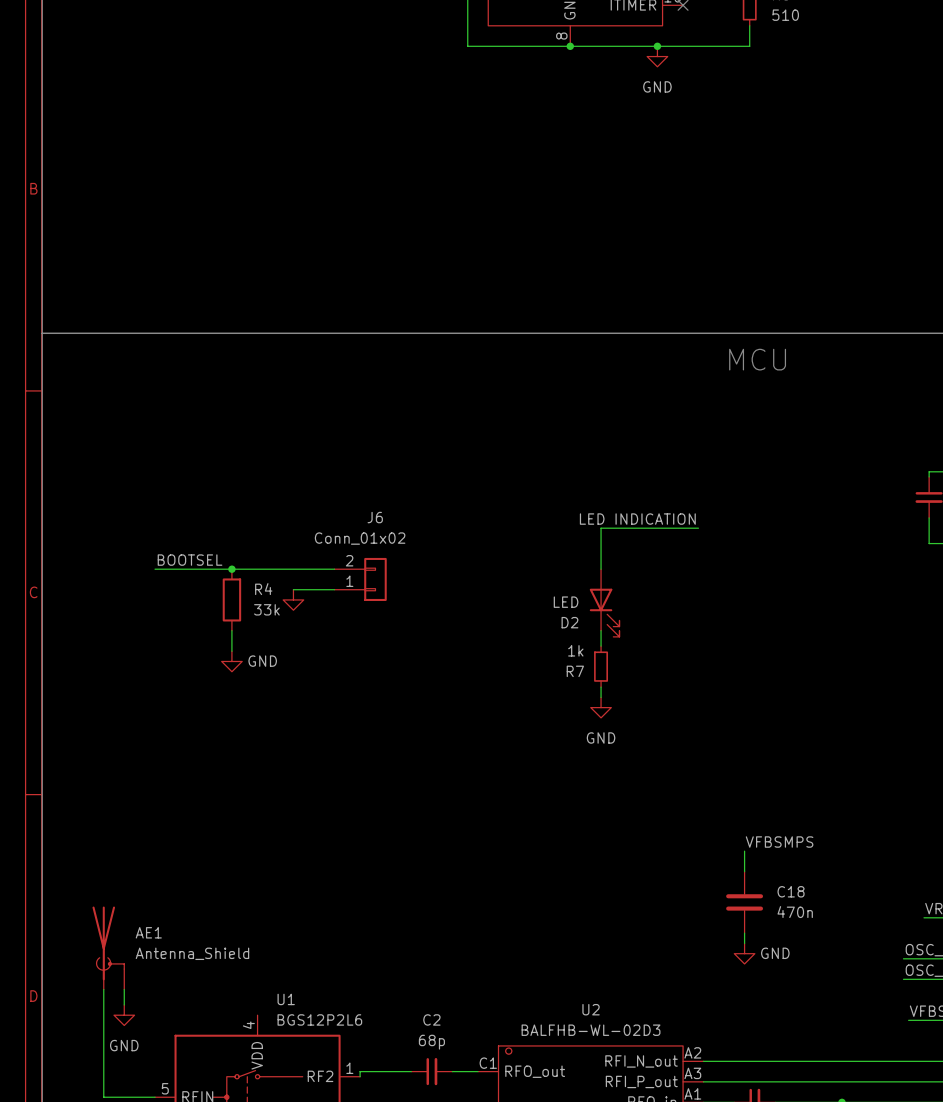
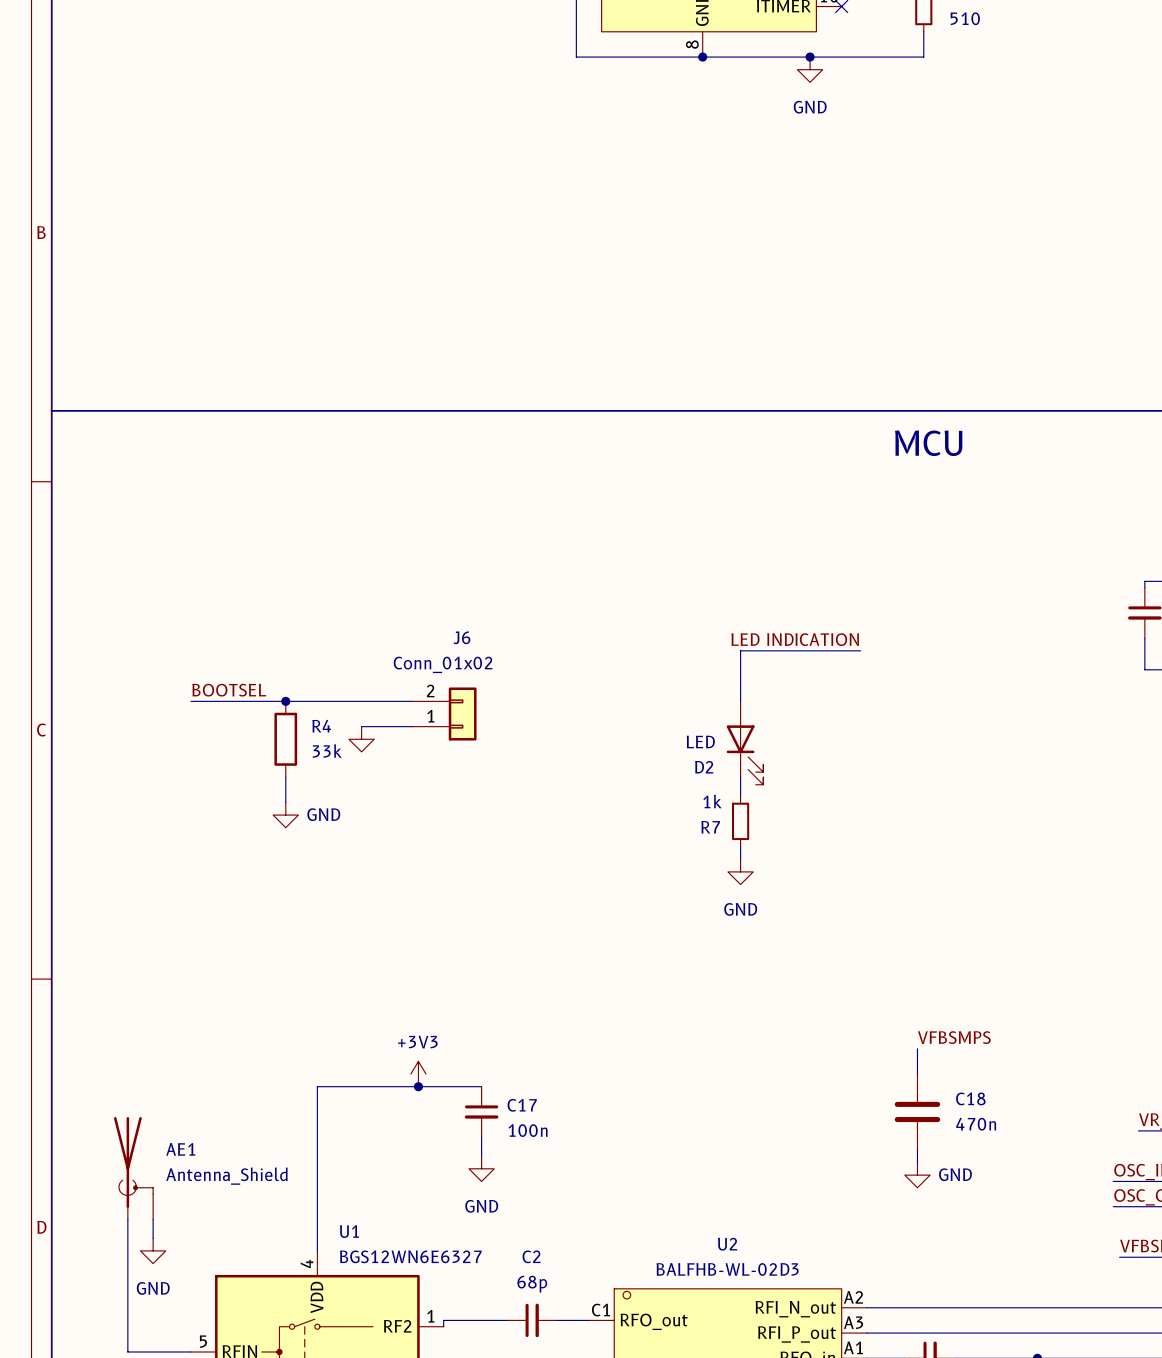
power symbol: none -> +3V3 (418, 1074)
junction: none -> (418, 1086)
wire: none -> (481, 1086) (317, 1086) (317, 1250)
C17: none -> 100n (481, 1111)
wire: none -> (481, 1137) (481, 1156)
power symbol: none -> GND (481, 1168)
U1 value: BGS12P2L6 (319, 1019) -> BGS12WN6E6327 (410, 1256)

